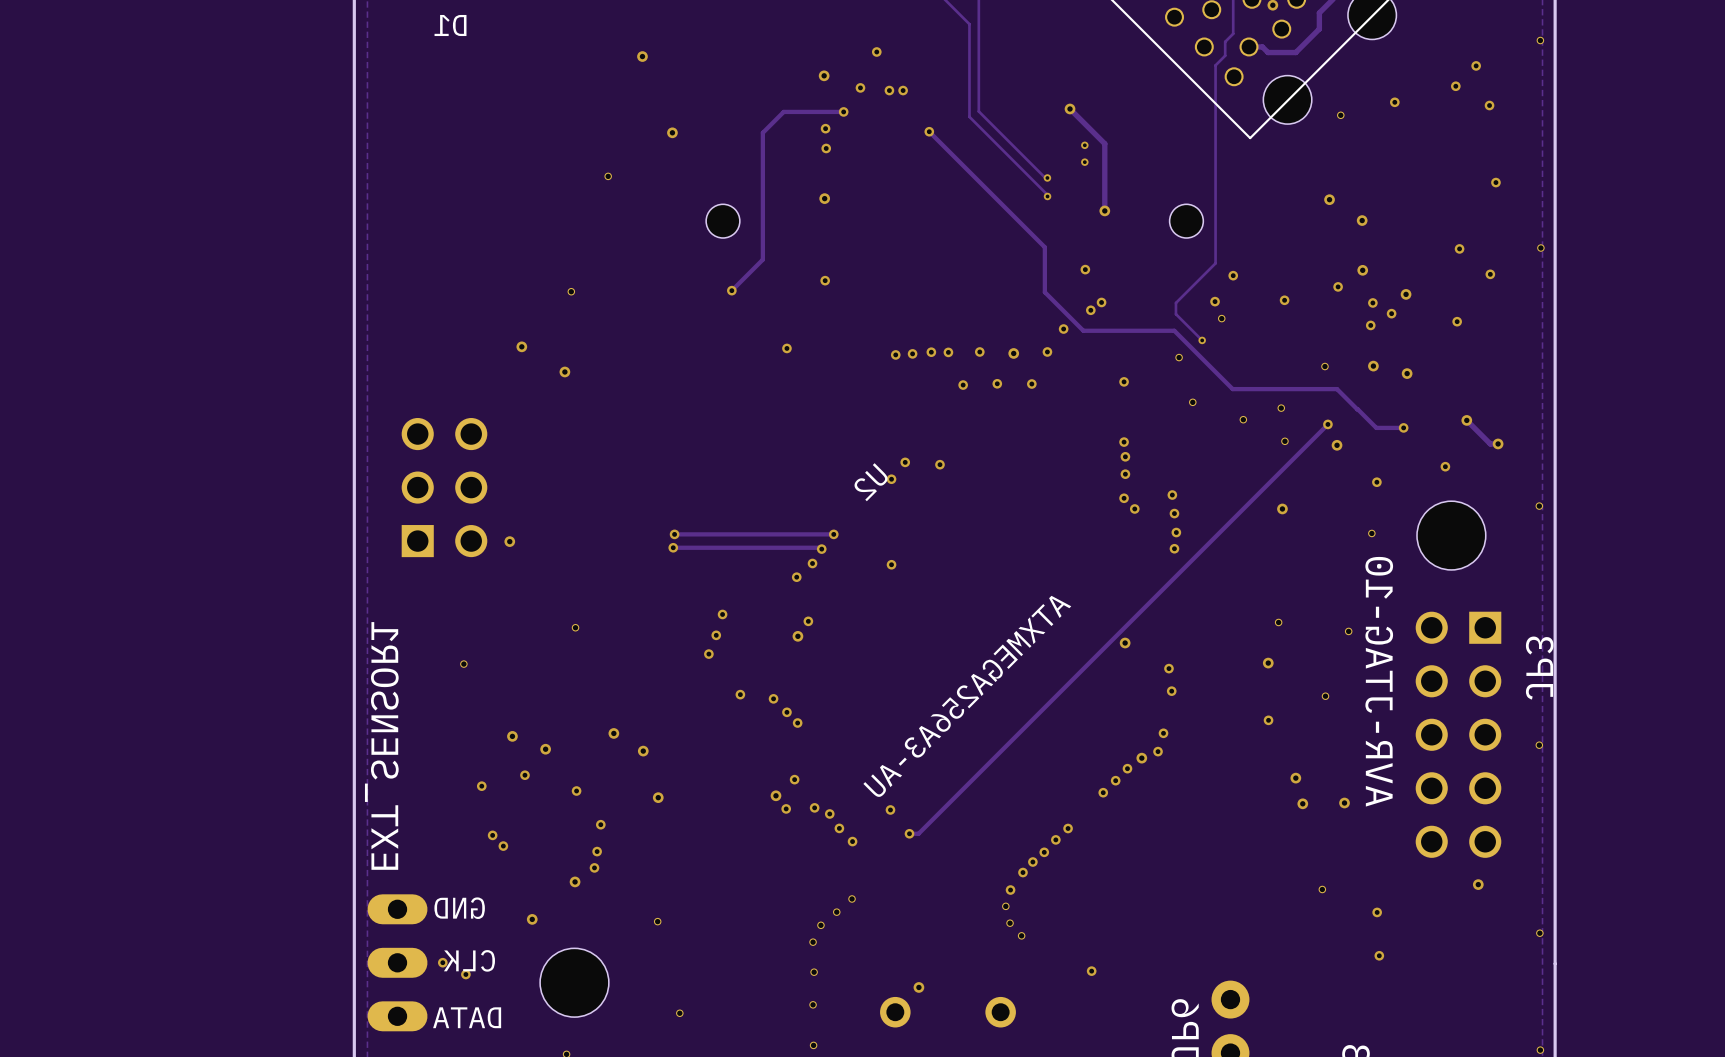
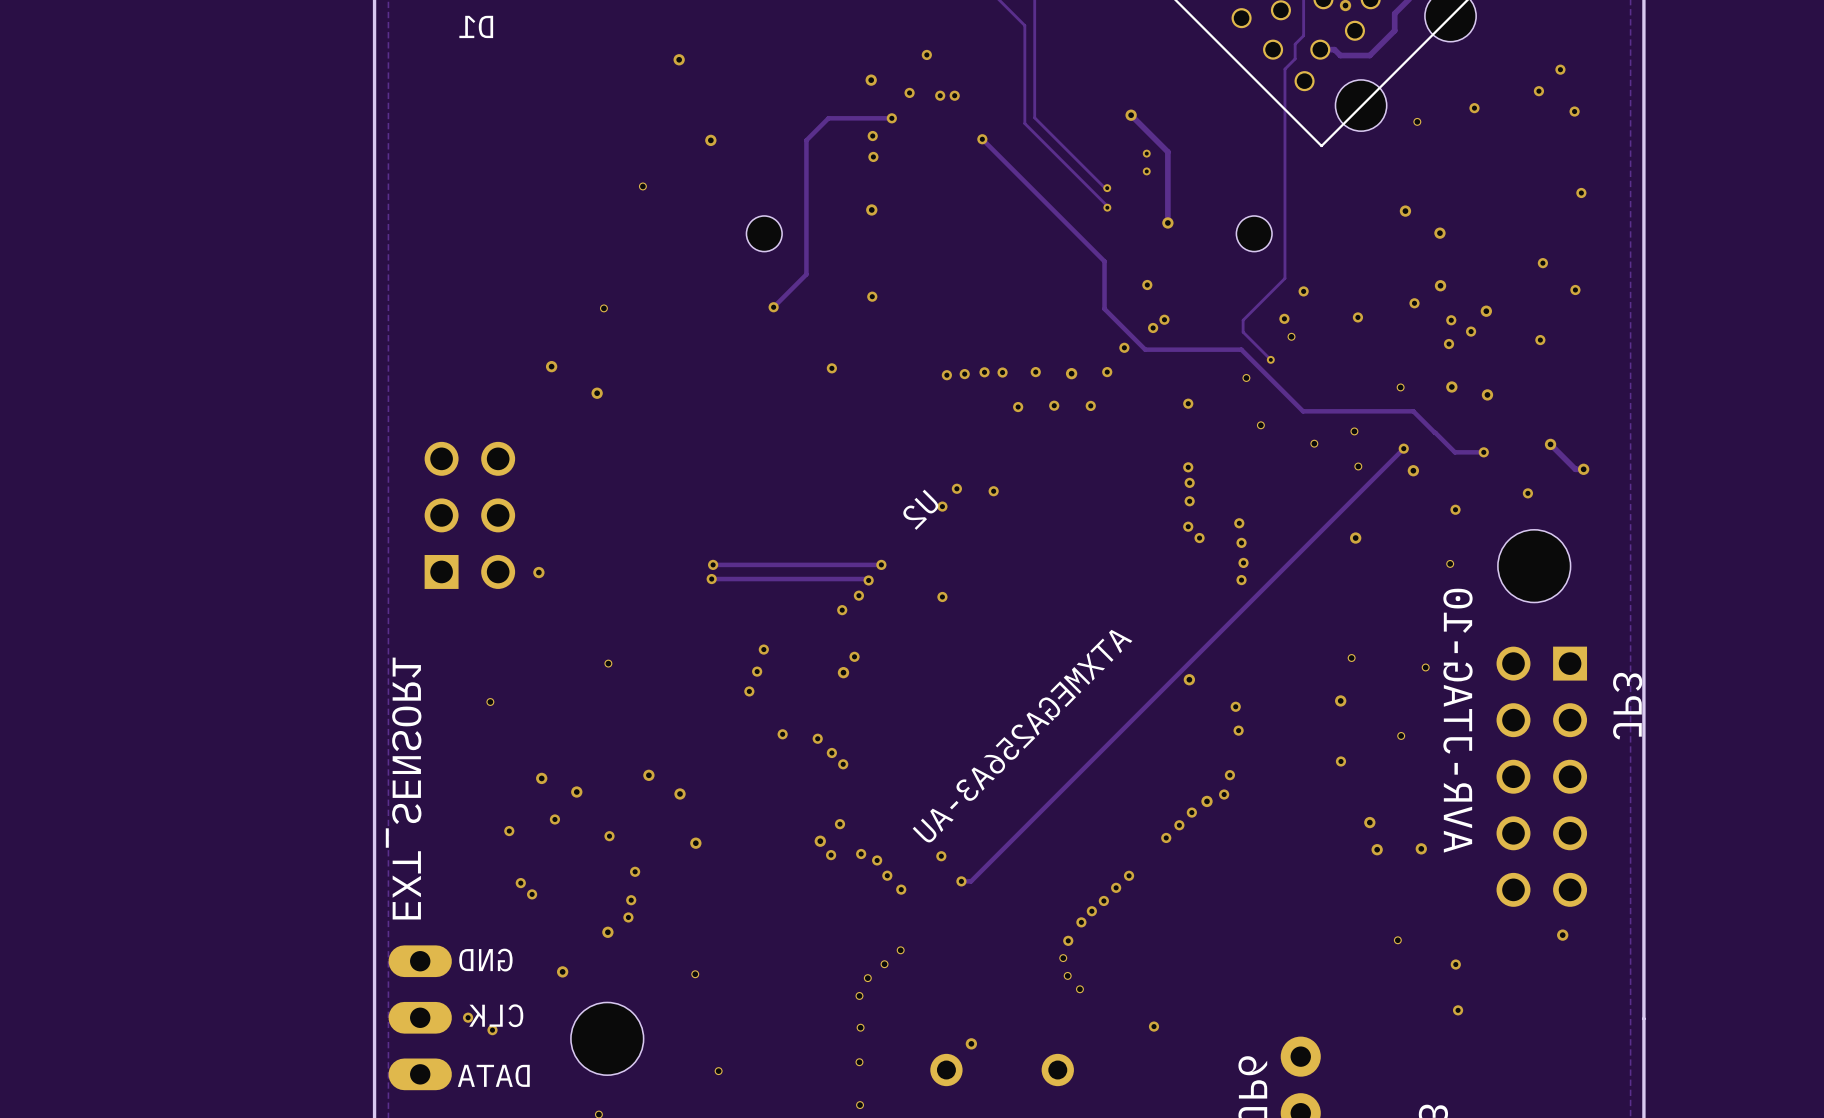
part: (1540, 40) -> none
part: (1540, 248) -> none
part: (1539, 506) -> none
part: (1539, 745) -> none
part: (1539, 933) -> none
part: (1540, 1050) -> none

